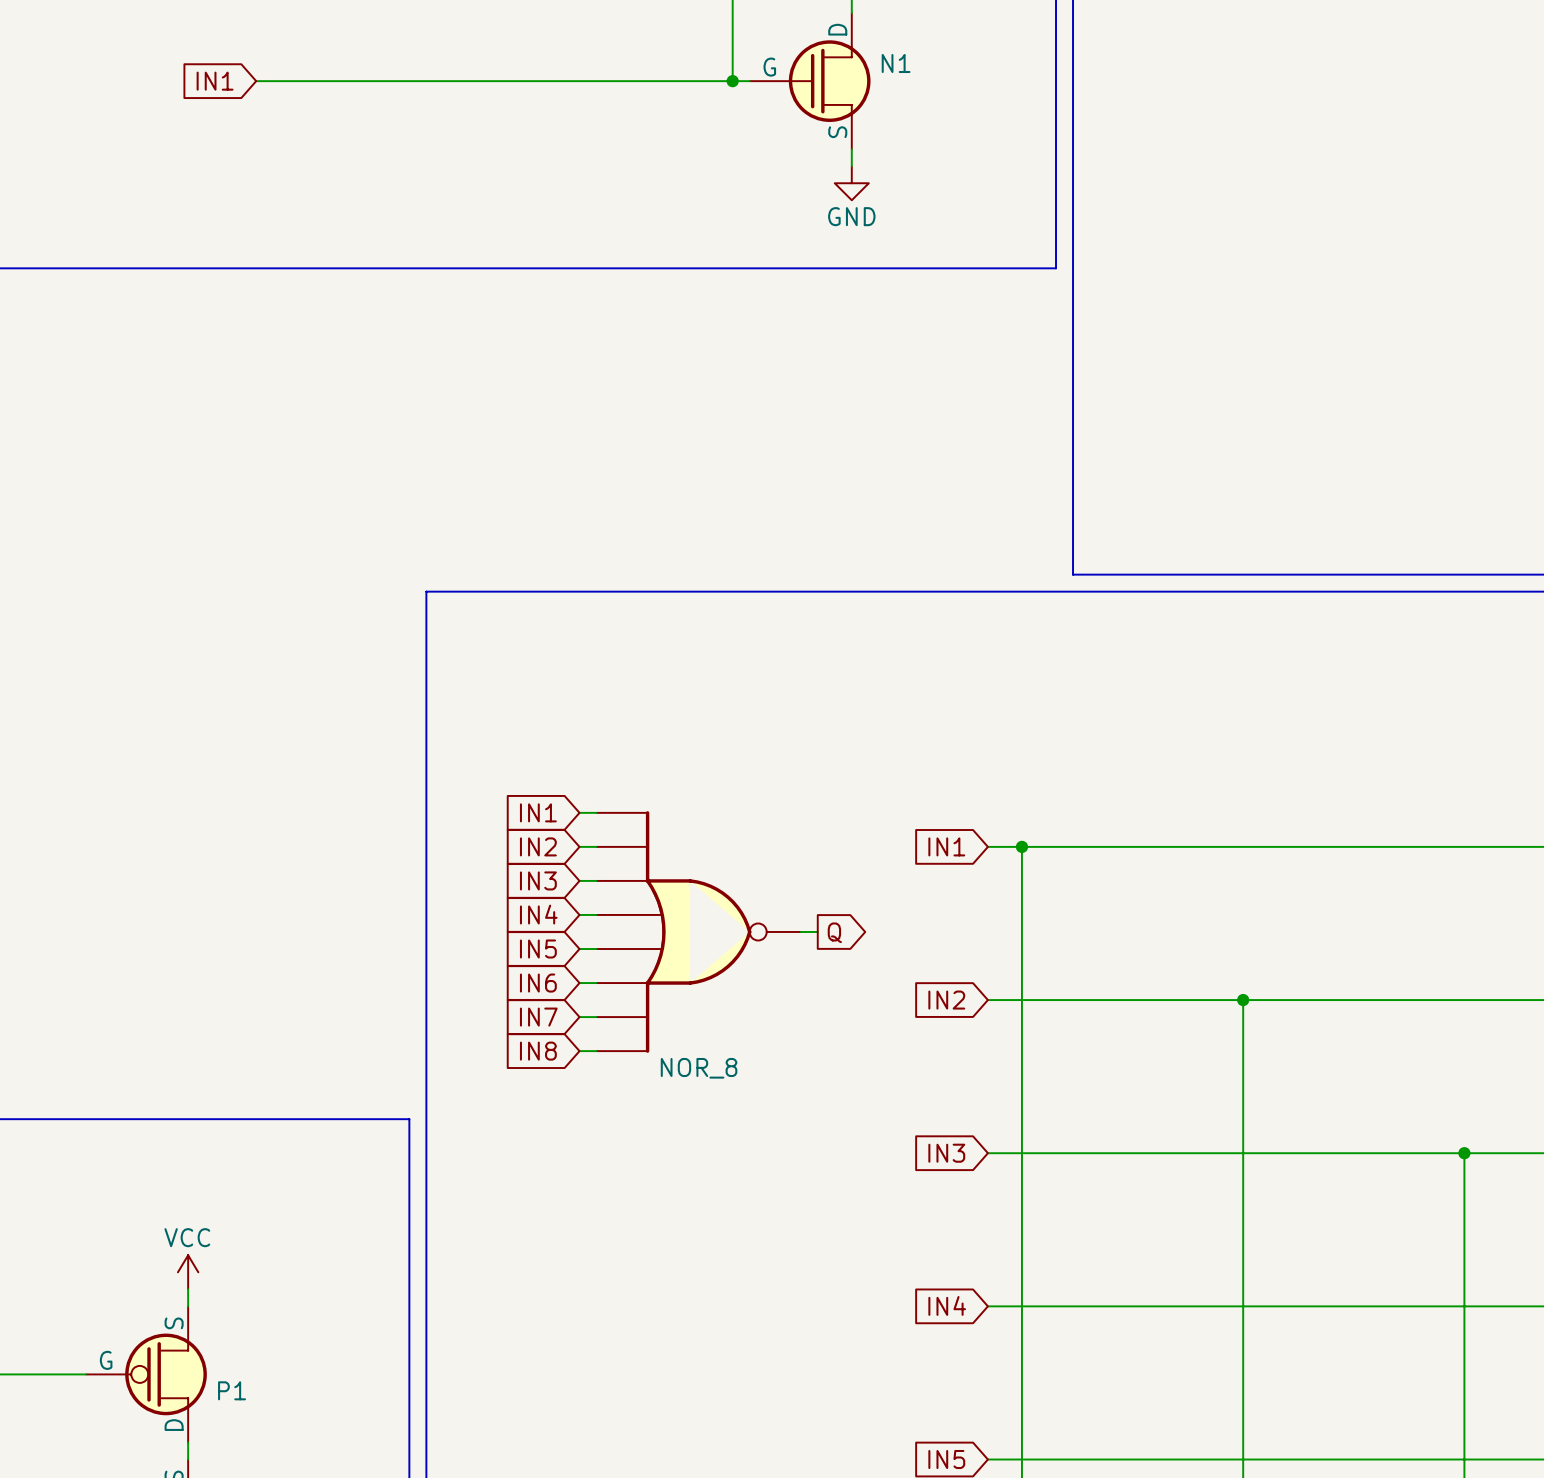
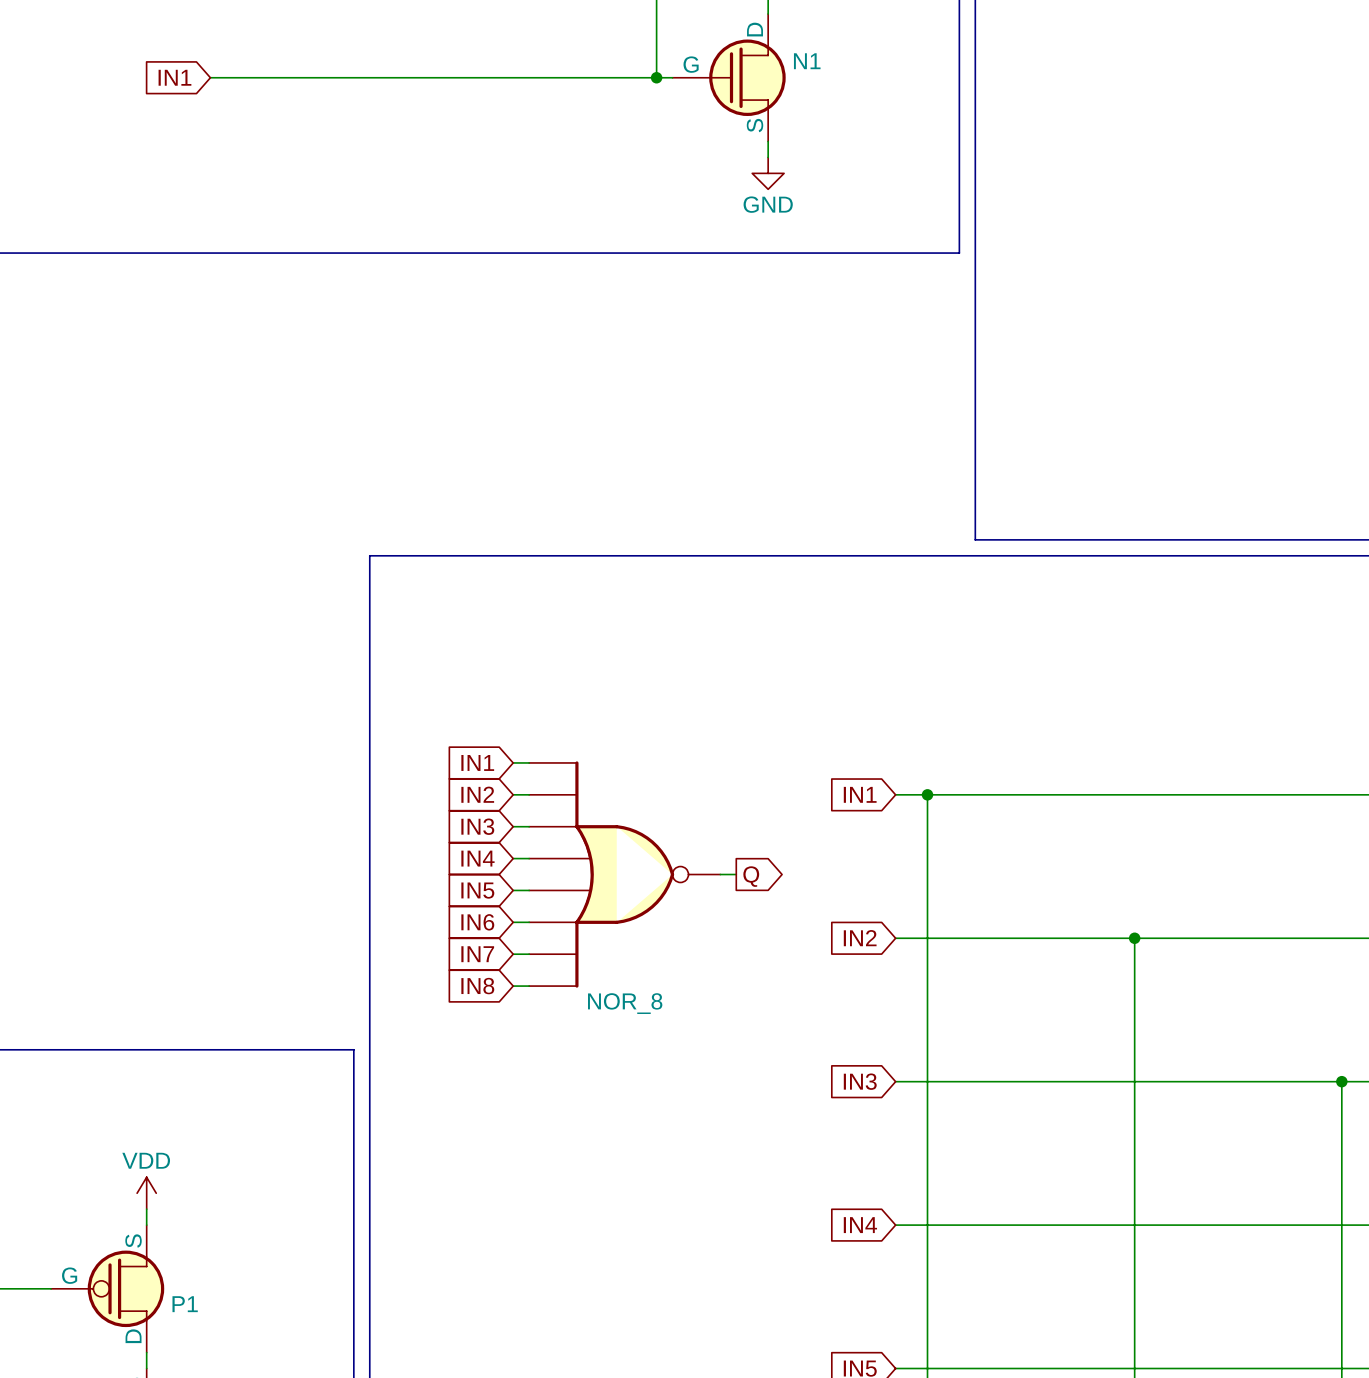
power symbol: VCC (188, 1272) -> VDD (146, 1193)

